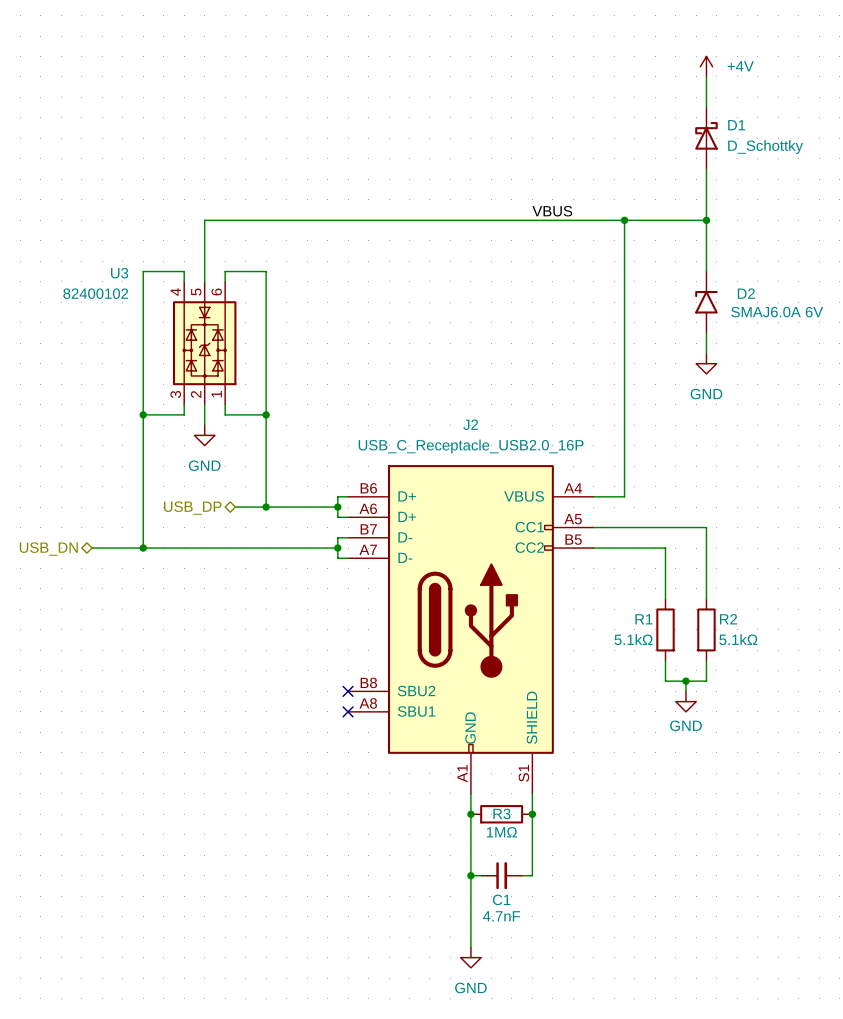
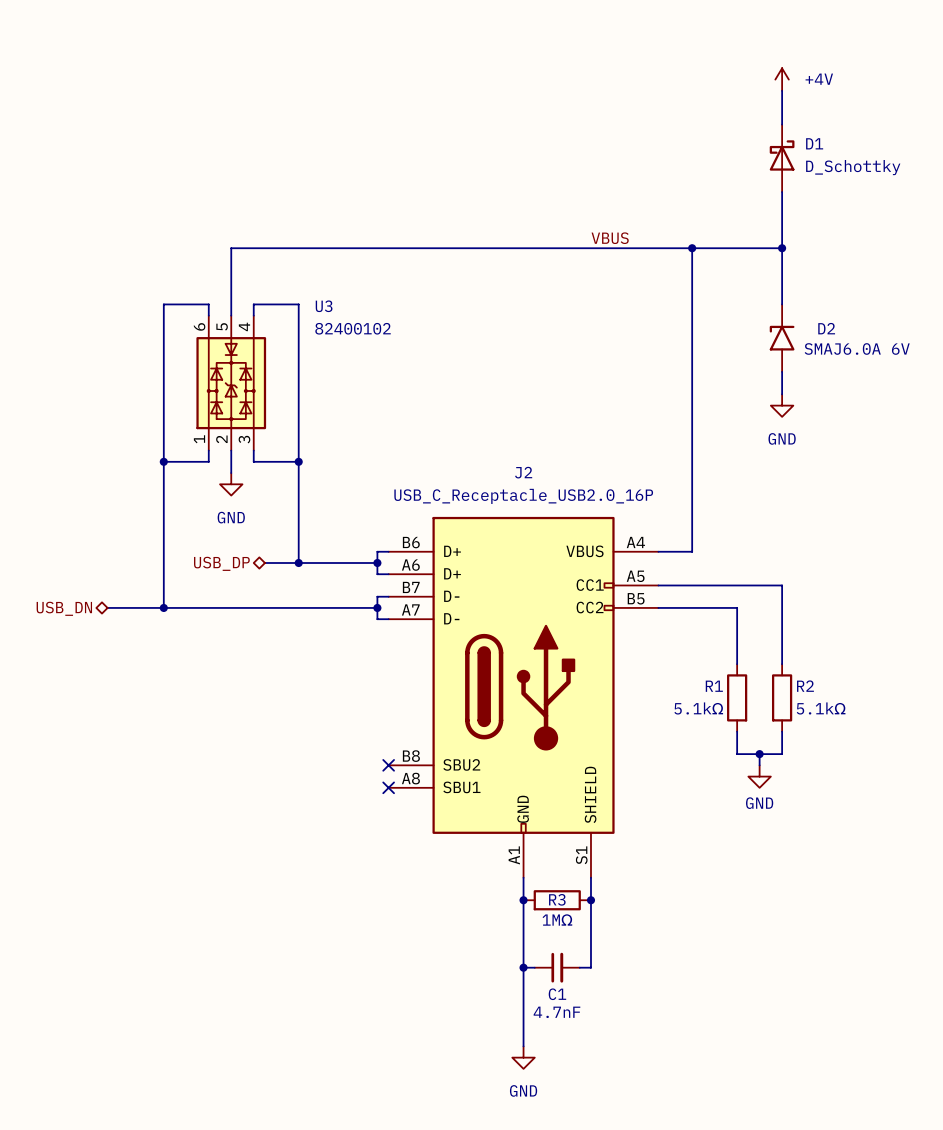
U3 flip: as is (204, 343) -> left-right (231, 383)

